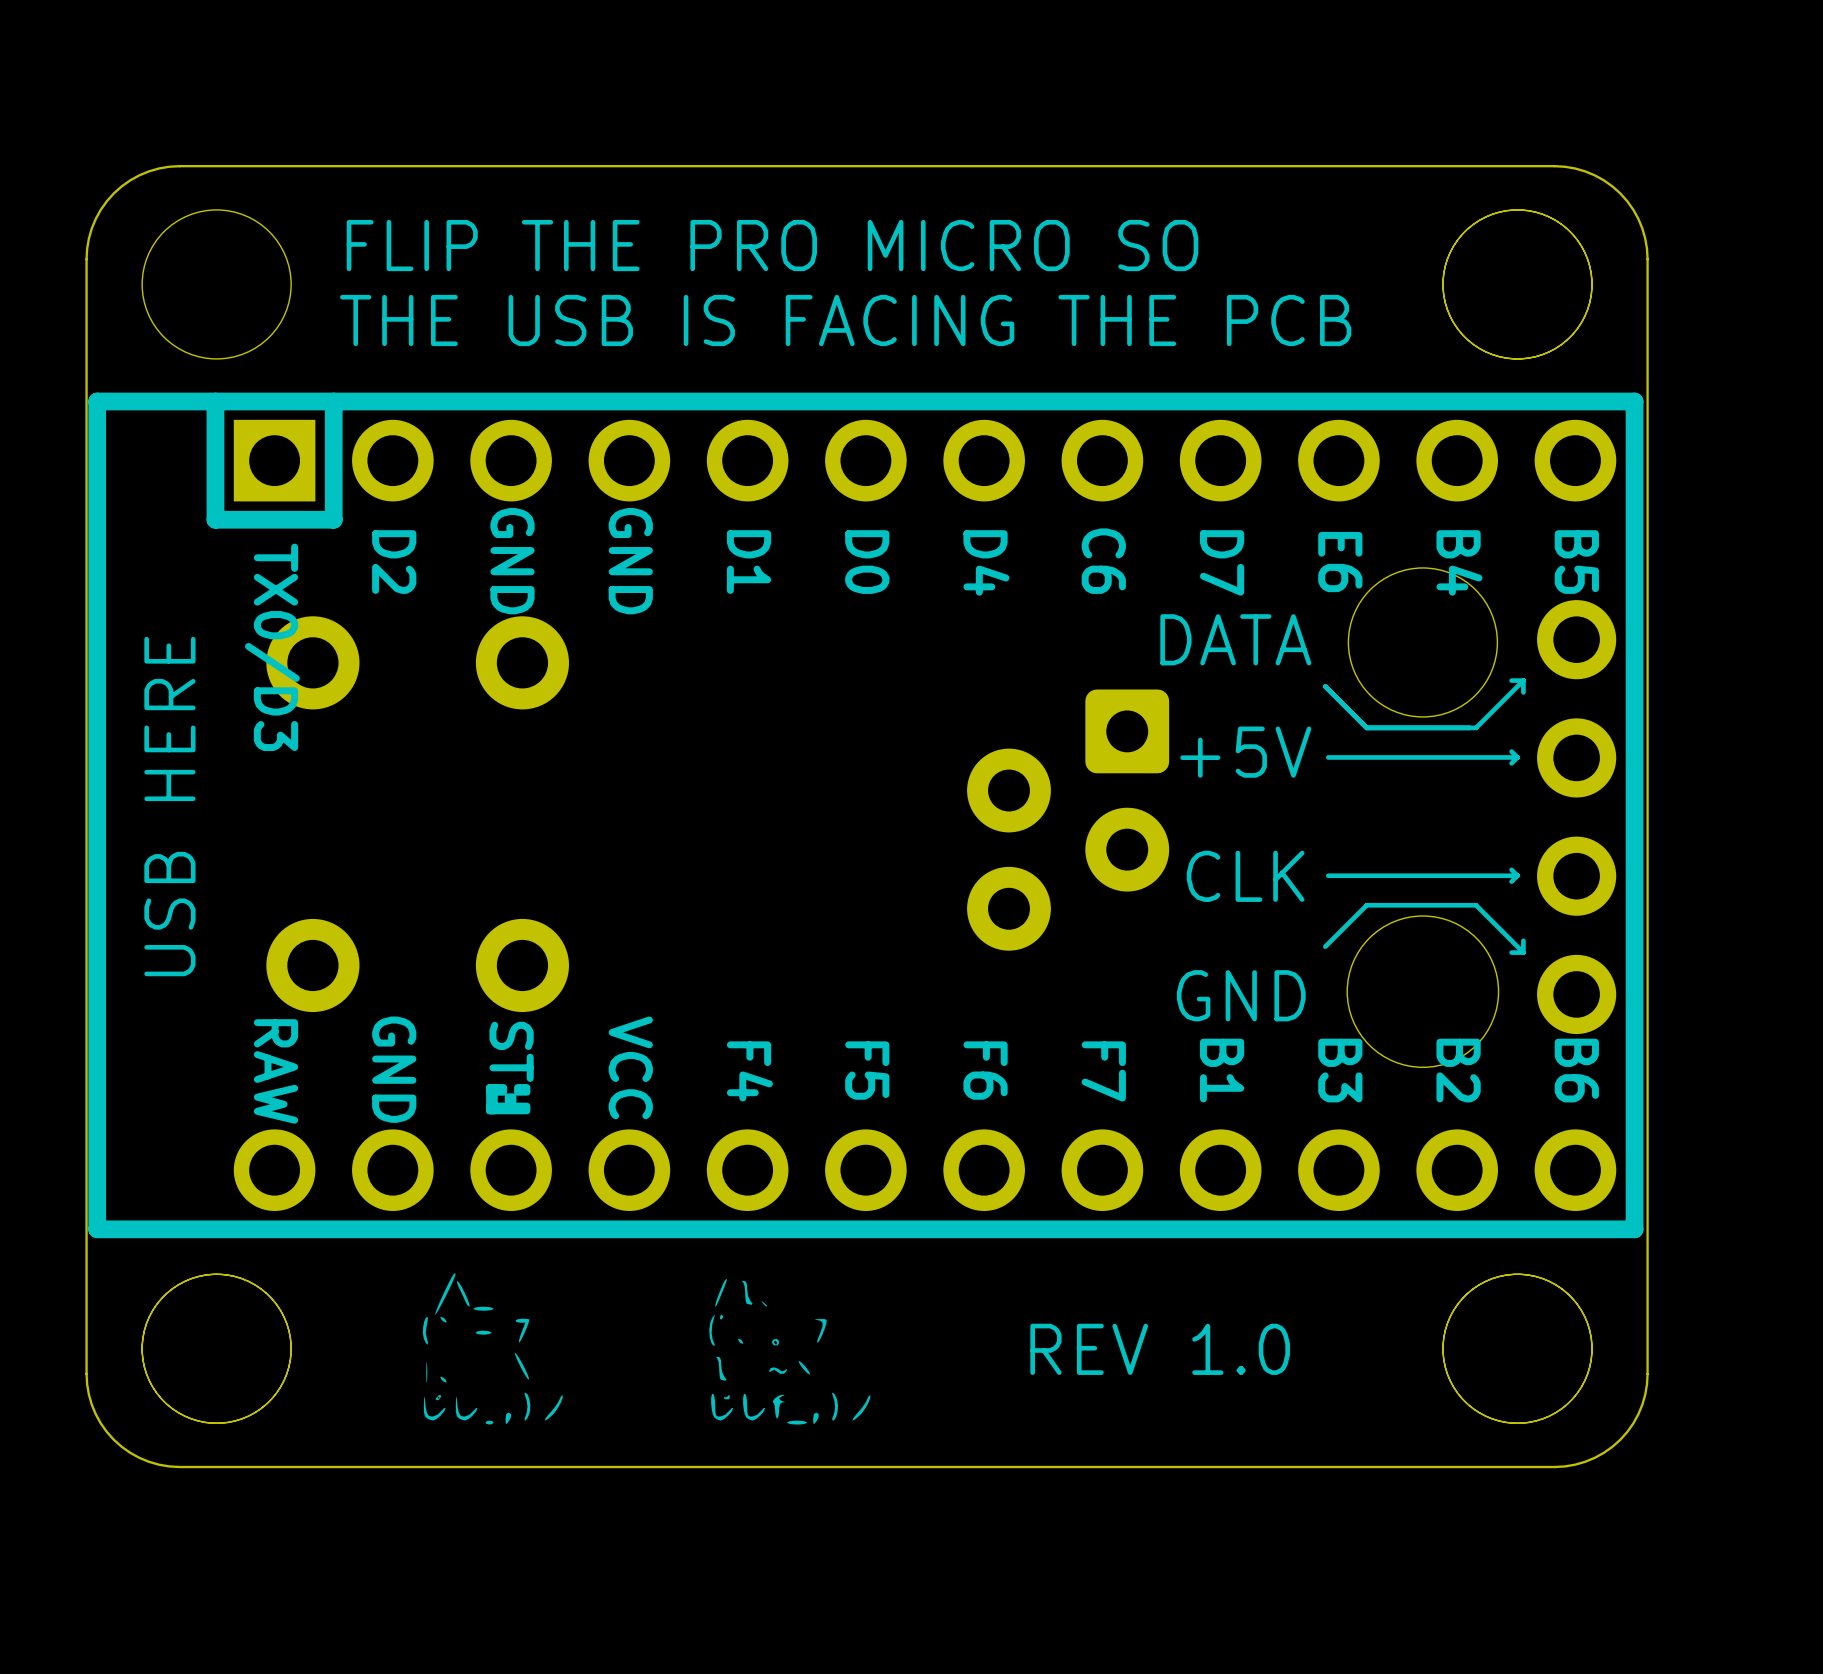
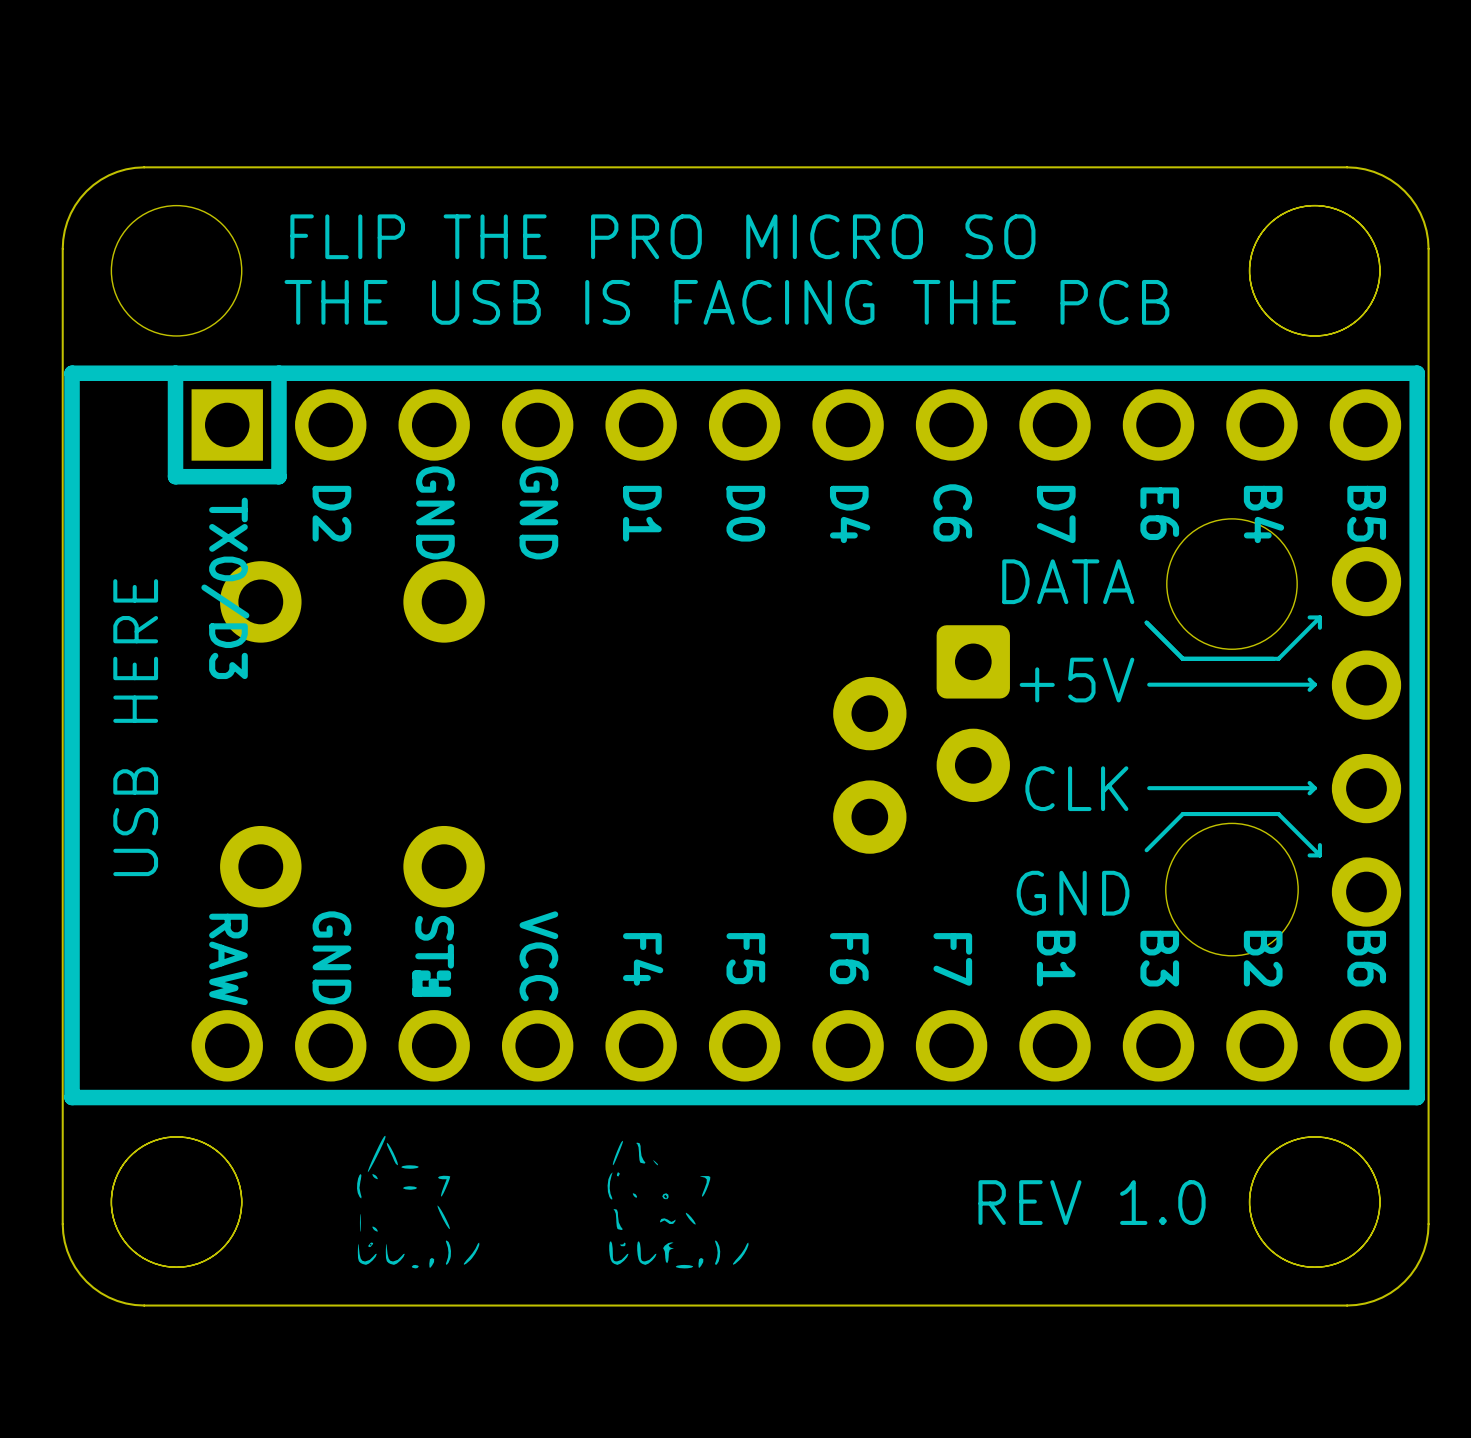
text position: REV 1.0 (1160, 1349) -> REV 1.0 (1092, 1202)

